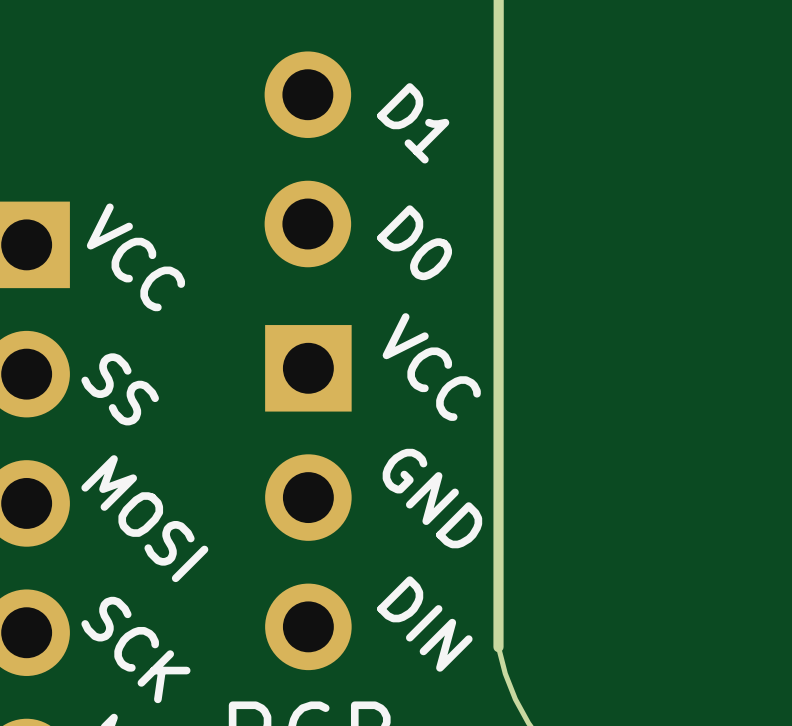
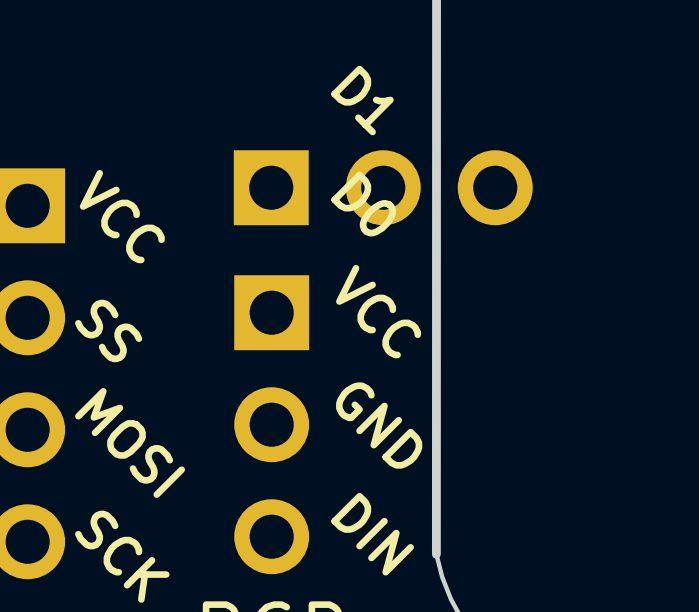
part: (307, 159) -> none
part: none -> (383, 187)

